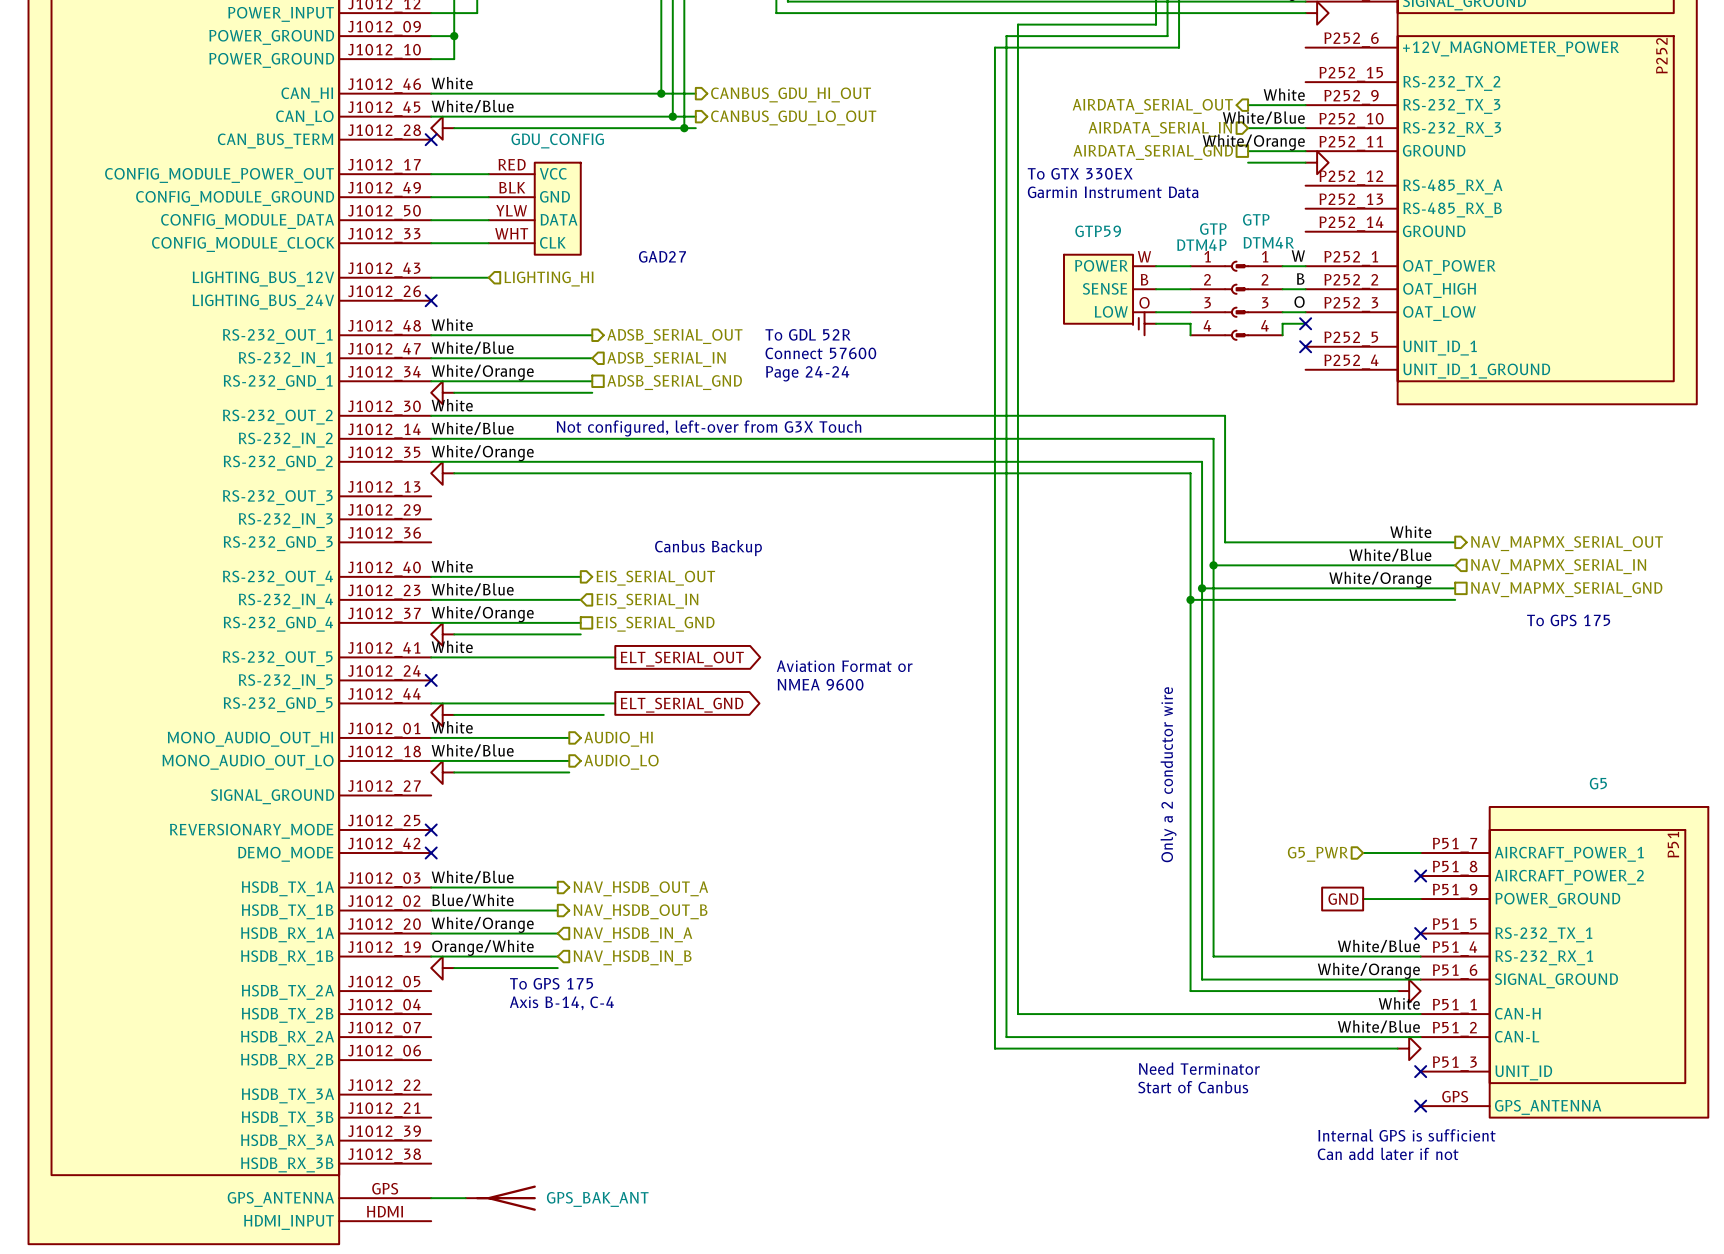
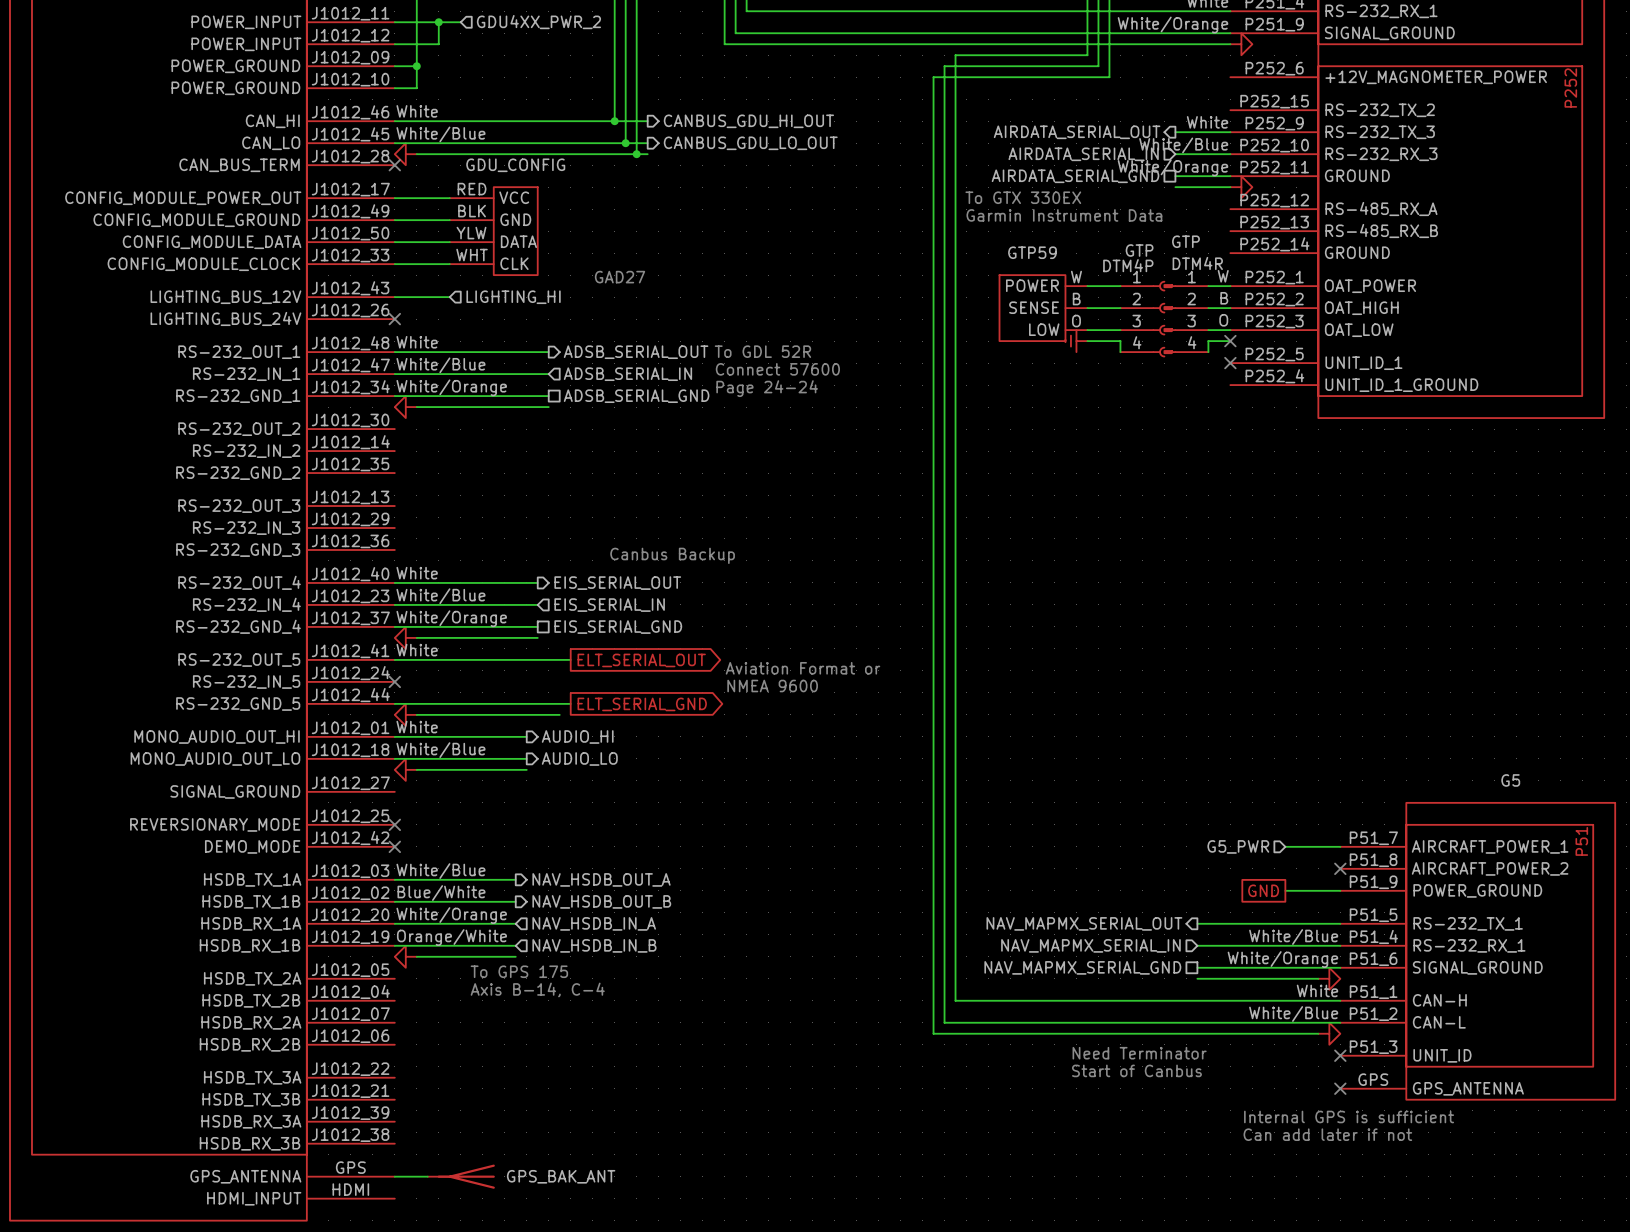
label: White (452, 405) -> none
wire: (431, 415) (1225, 415) (1225, 542) (1455, 542) -> none
label: White/Blue (472, 428) -> none
text: Not configured, left-over from G3X Touch (709, 428) -> none
wire: (431, 438) (1213, 438) (1213, 956) (1271, 956) -> none
label: White/Orange (482, 453) -> none
wire: (431, 461) (1202, 461) (1202, 979) (1271, 979) -> none
power symbol: (442, 473) -> none
wire: (454, 473) (1190, 473) (1190, 991) (1271, 991) -> none
label: White (1410, 531) -> none
hierarchical label: NAV_MAPMX_SERIAL_OUT (1567, 543) -> none
label: White/Blue (1390, 555) -> none
wire: (1213, 565) (1455, 565) -> none
junction: (1213, 565) -> none
hierarchical label: NAV_MAPMX_SERIAL_IN (1558, 566) -> none
label: White/Orange (1380, 579) -> none
wire: (1202, 588) (1455, 588) -> none
junction: (1202, 588) -> none
hierarchical label: NAV_MAPMX_SERIAL_GND (1566, 589) -> none
wire: (1190, 599) (1455, 599) -> none
junction: (1190, 599) -> none
text: To GPS 175 (1568, 620) -> none
text: Only a 2 conductor wire (1168, 774) -> none
wire: none -> (1197, 923) (1340, 923)
no-connect mark: (1420, 933) -> none
hierarchical label: none -> NAV_MAPMX_SERIAL_OUT (1084, 923)
hierarchical label: none -> NAV_MAPMX_SERIAL_IN (1090, 945)
hierarchical label: none -> NAV_MAPMX_SERIAL_GND (1082, 967)

